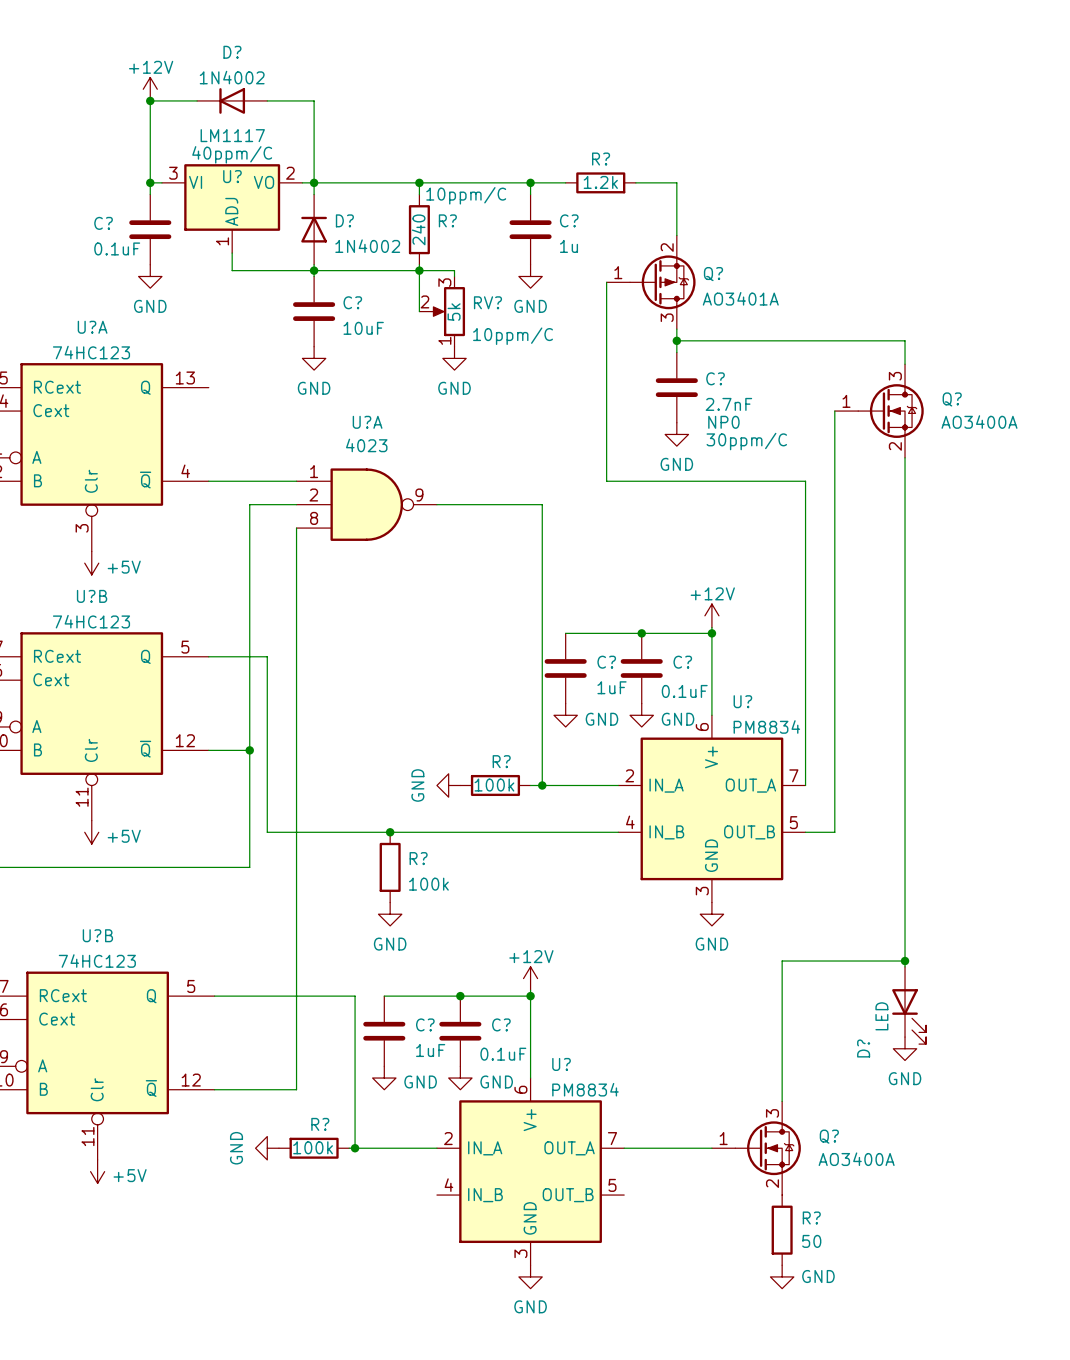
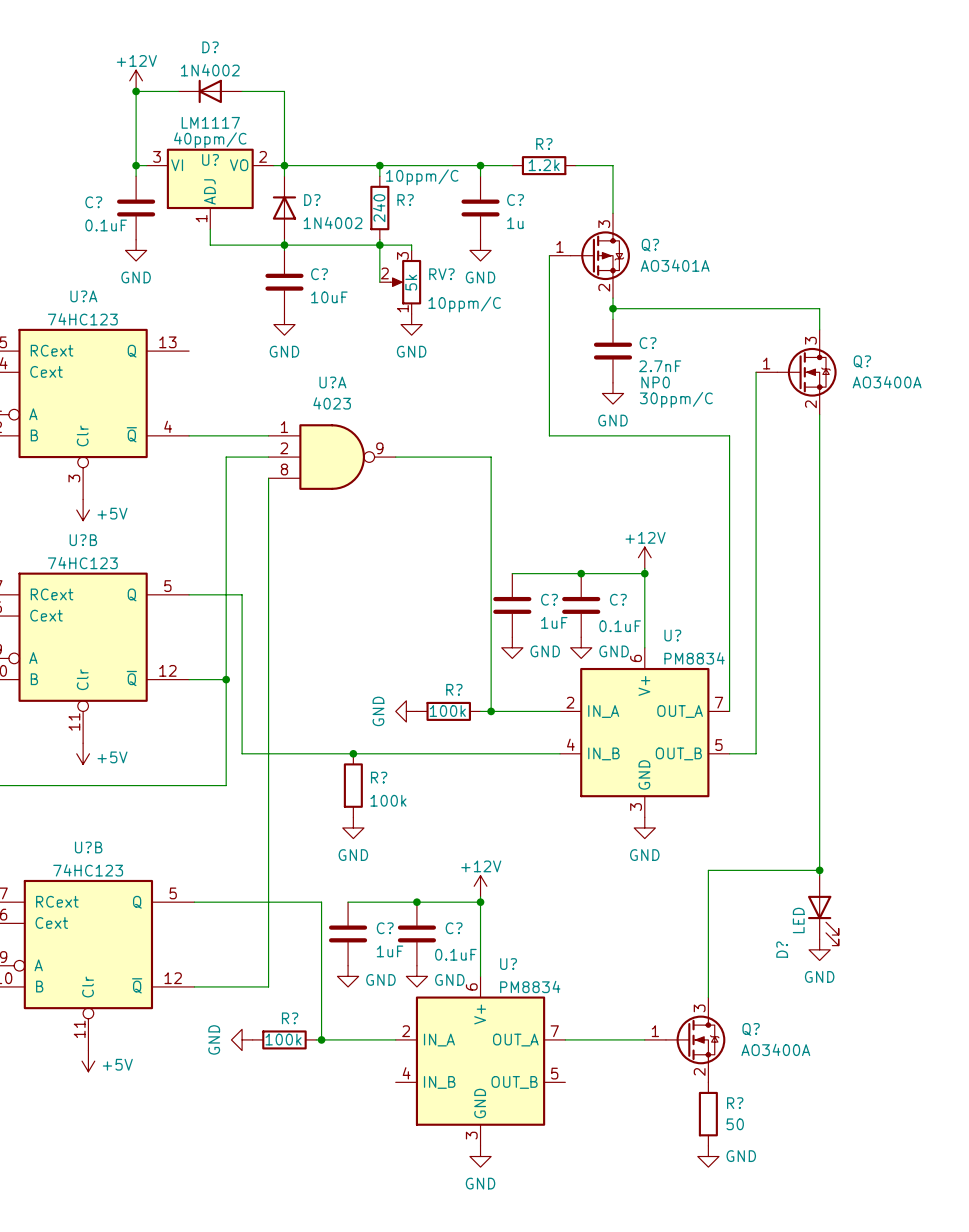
Q? flip: as is (662, 282) -> up-down (600, 255)

